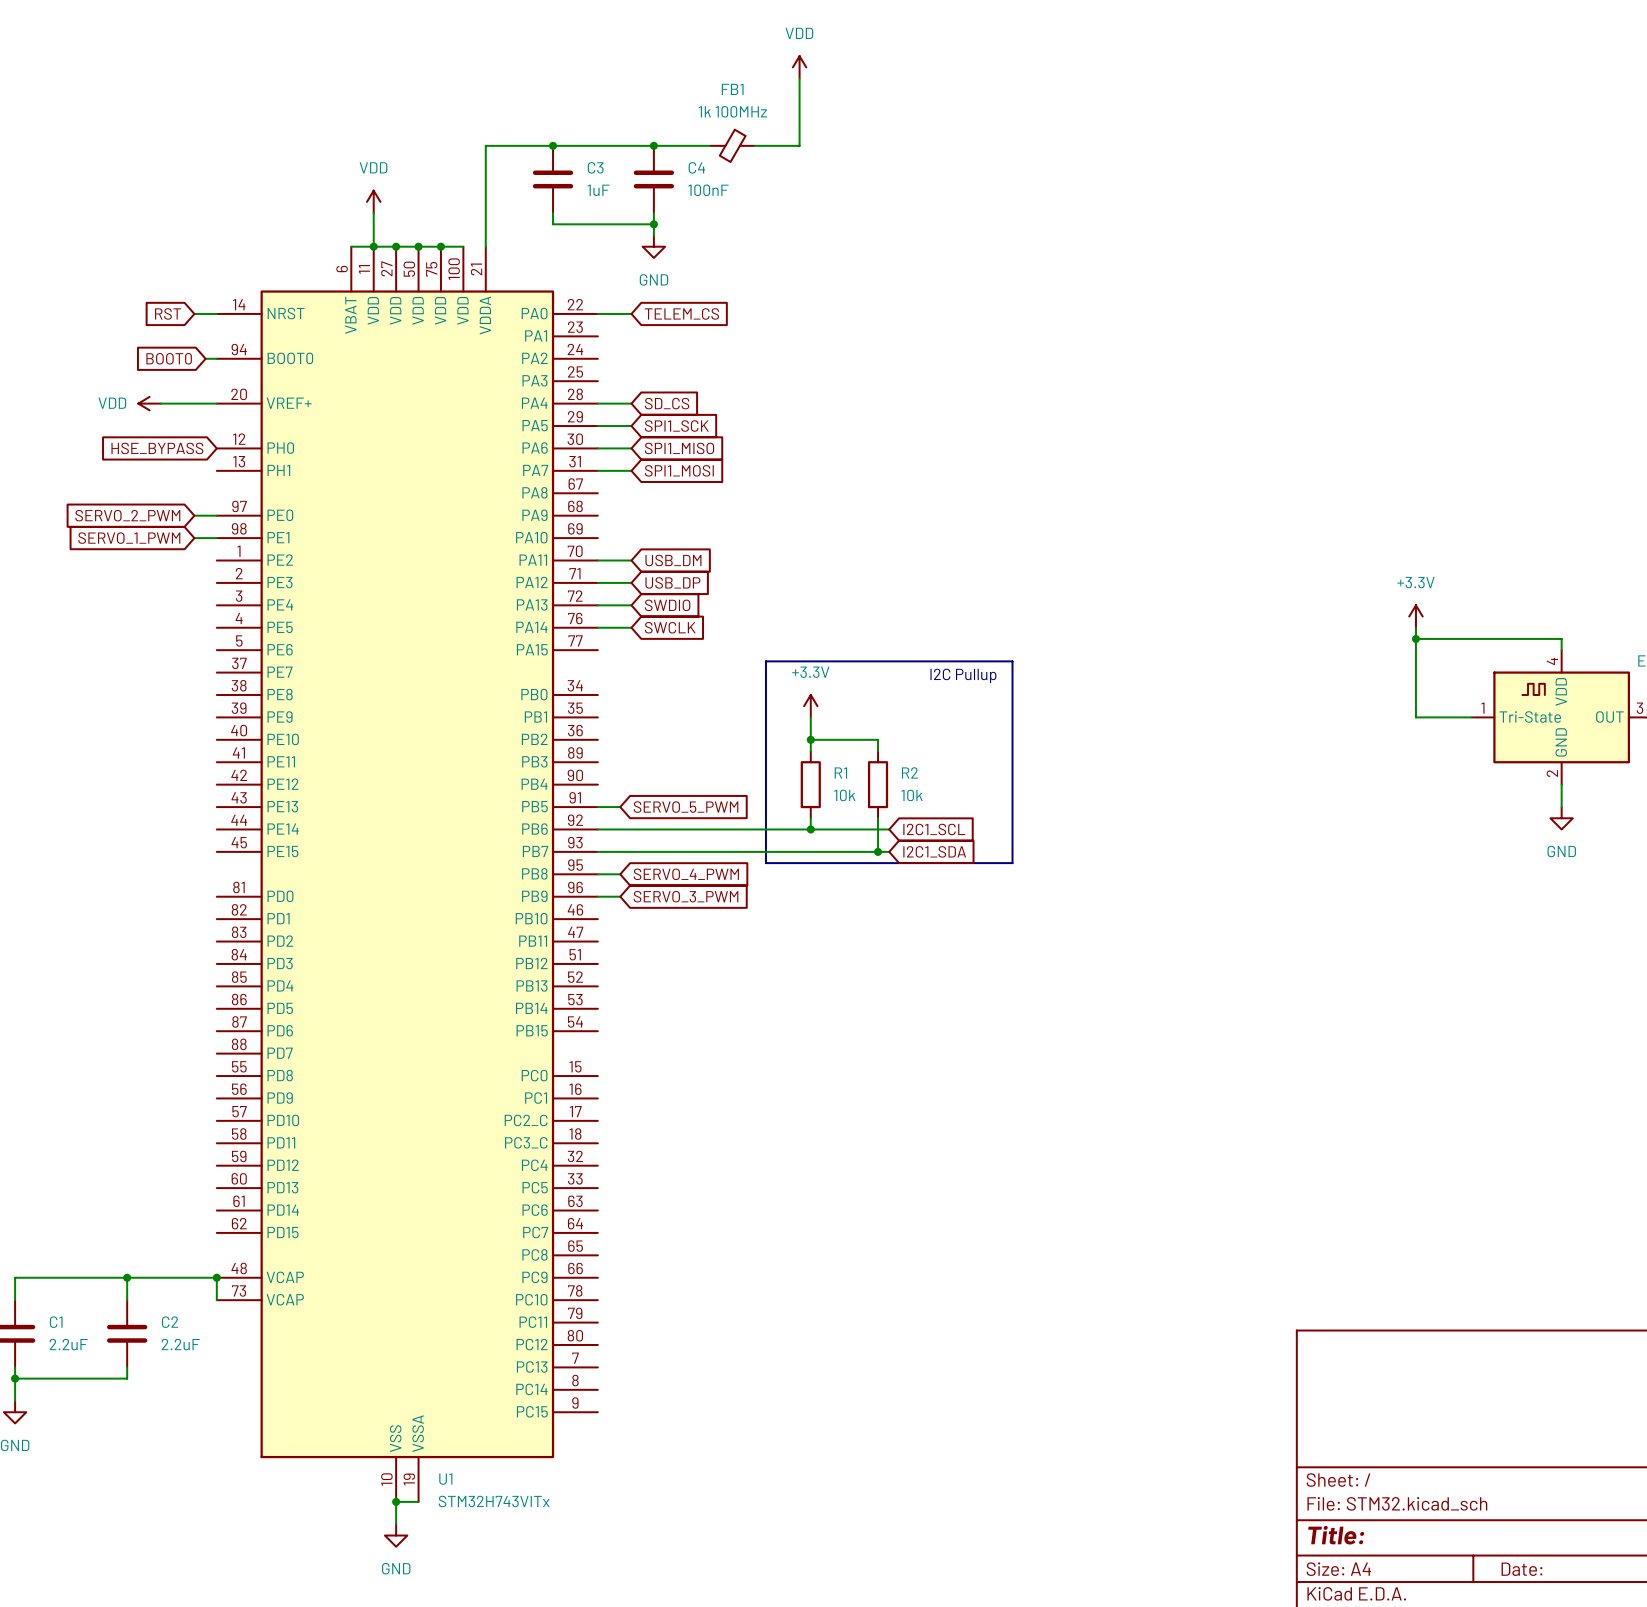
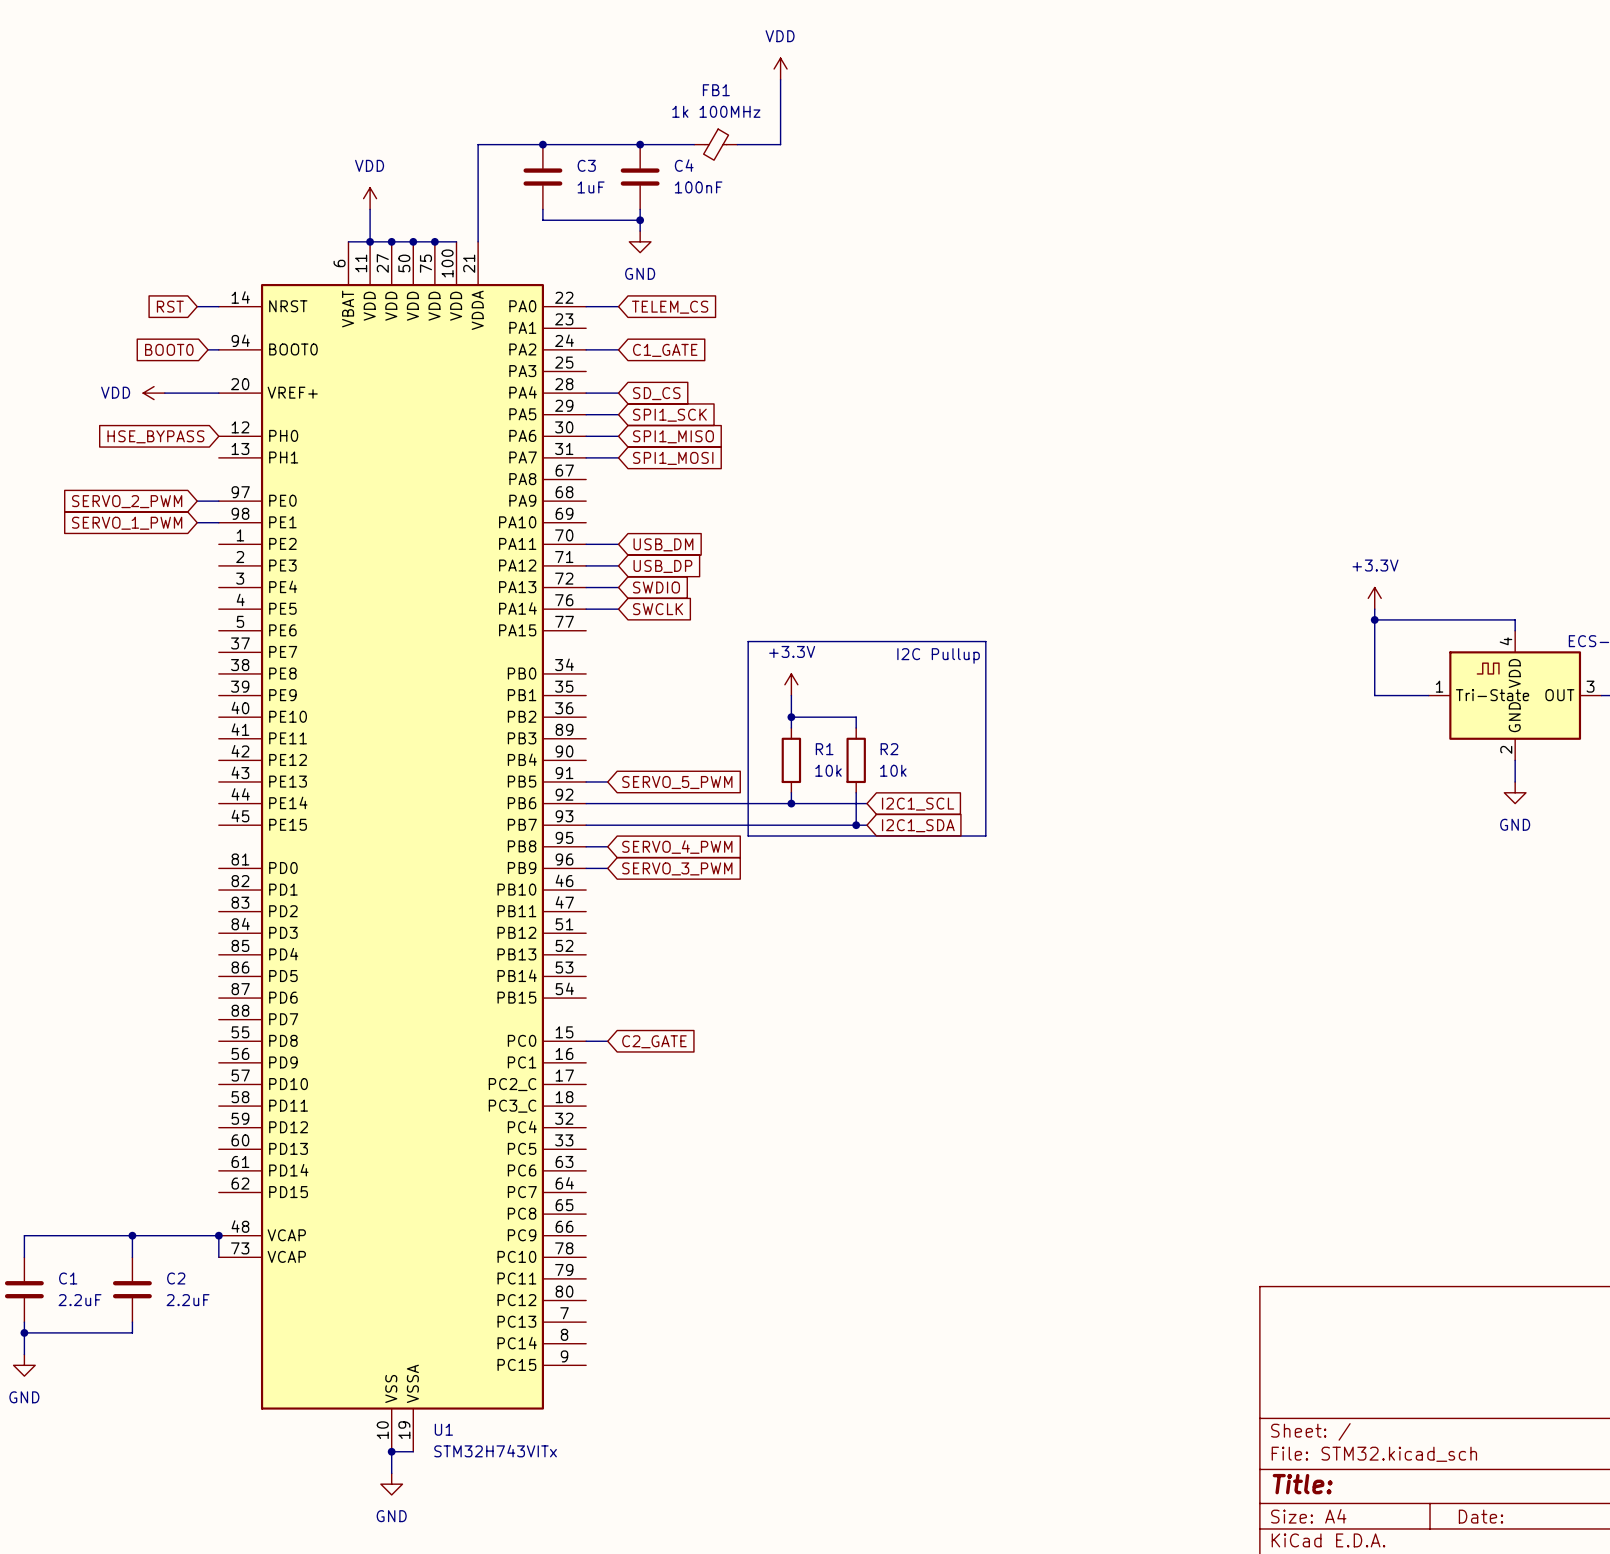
wire: none -> (586, 349) (618, 349)
global label: none -> C1_GATE (665, 350)
wire: none -> (586, 1041) (607, 1041)
global label: none -> C2_GATE (654, 1041)

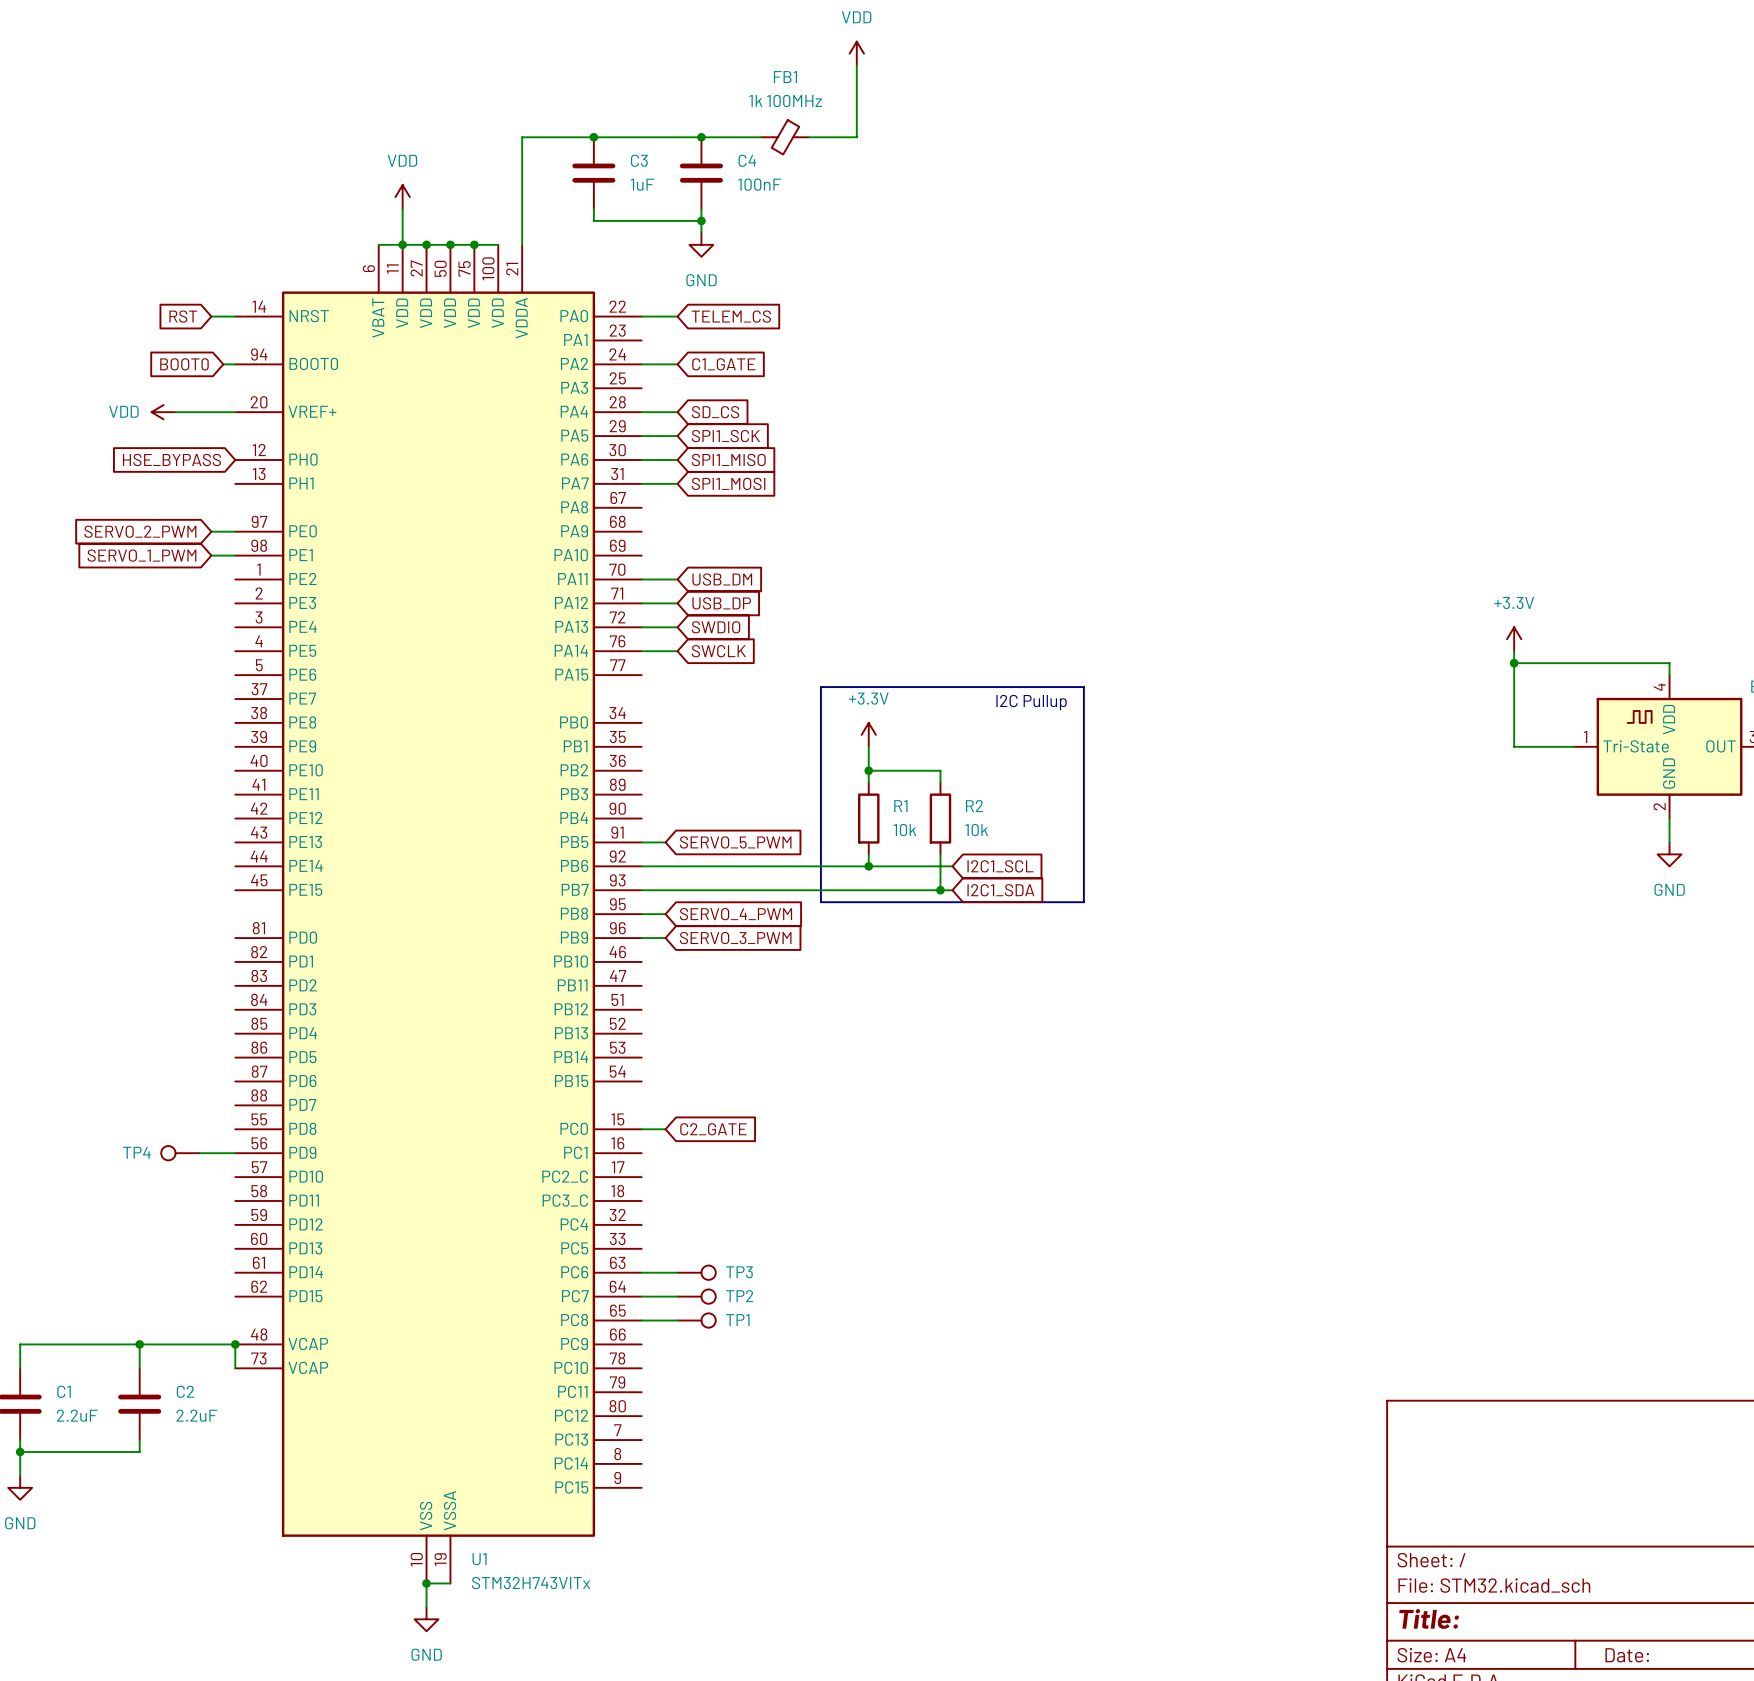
TP4: none -> (180, 1153)
wire: none -> (199, 1153) (235, 1153)
wire: none -> (641, 1272) (677, 1272)
TP3: none -> (696, 1272)
wire: none -> (641, 1296) (677, 1296)
TP2: none -> (696, 1296)
wire: none -> (641, 1320) (677, 1320)
TP1: none -> (696, 1320)

